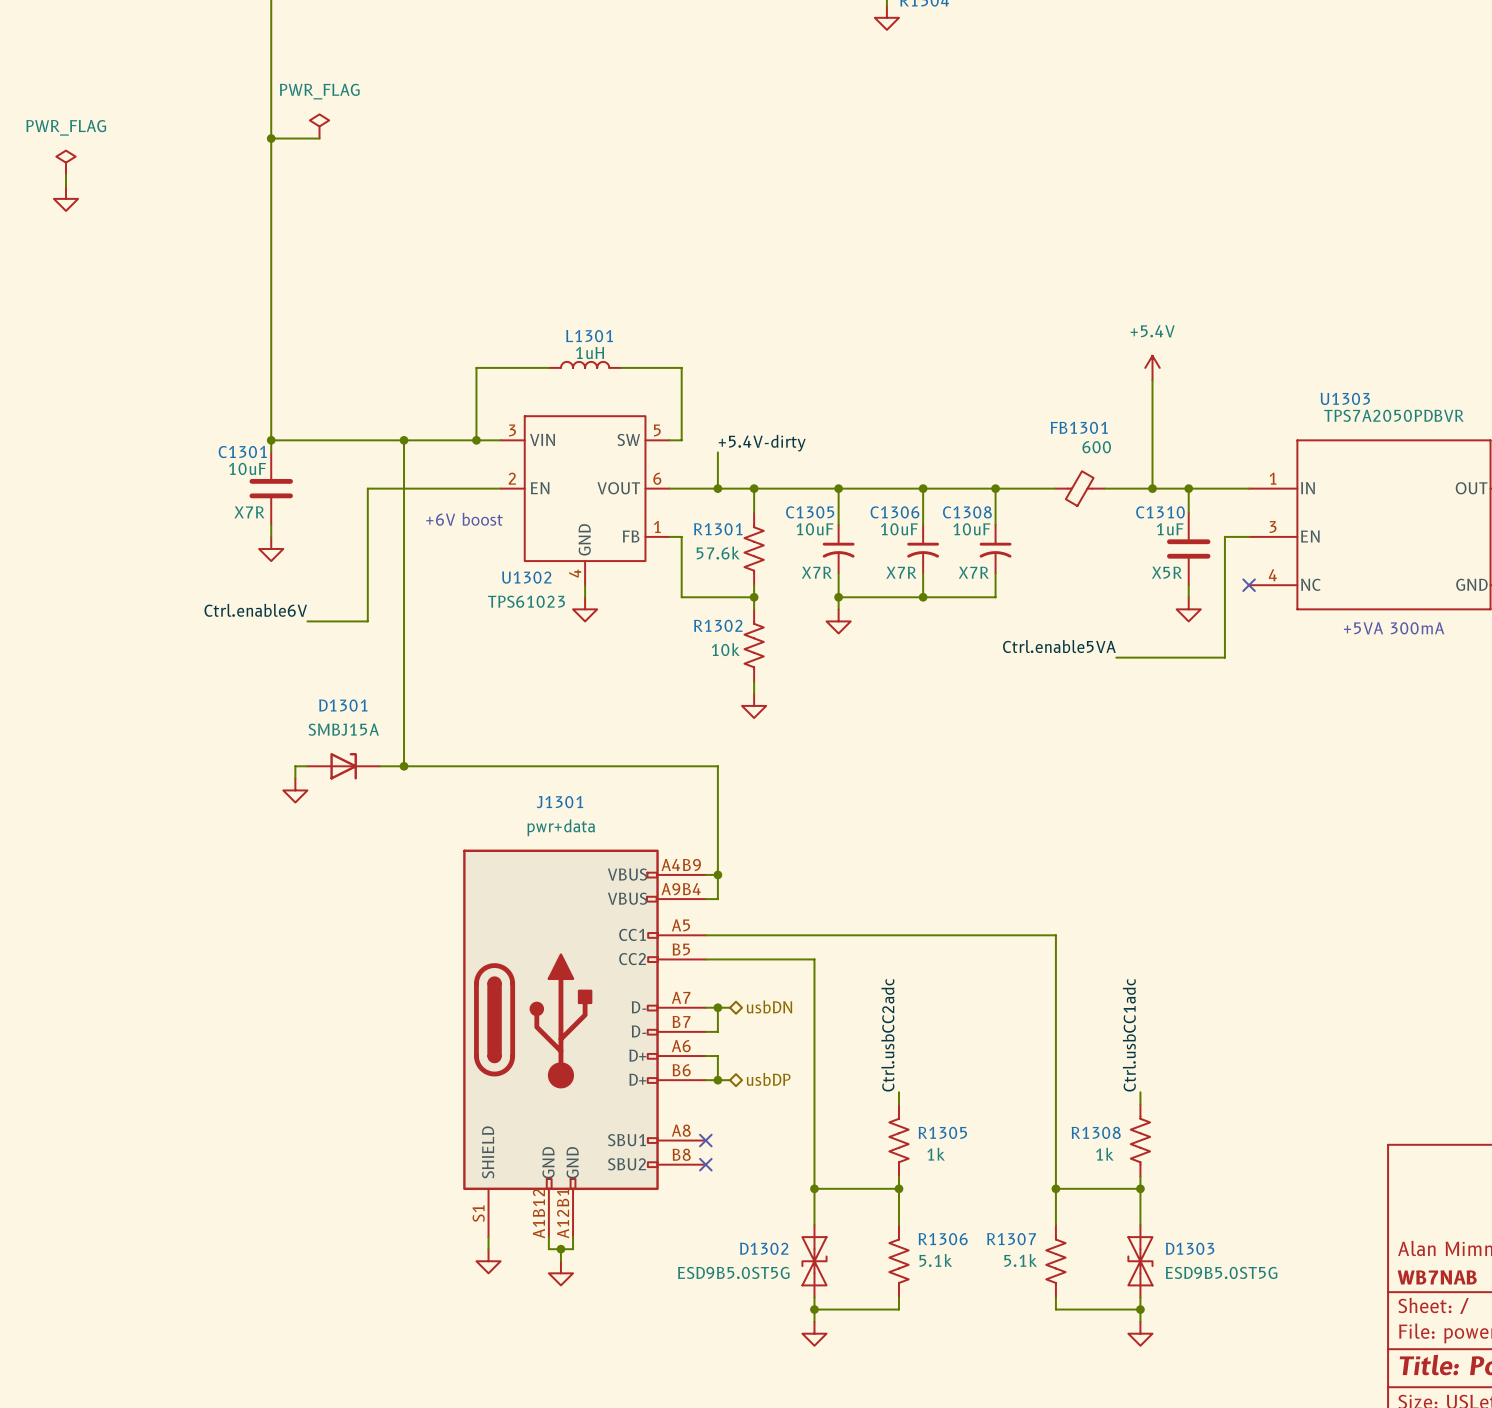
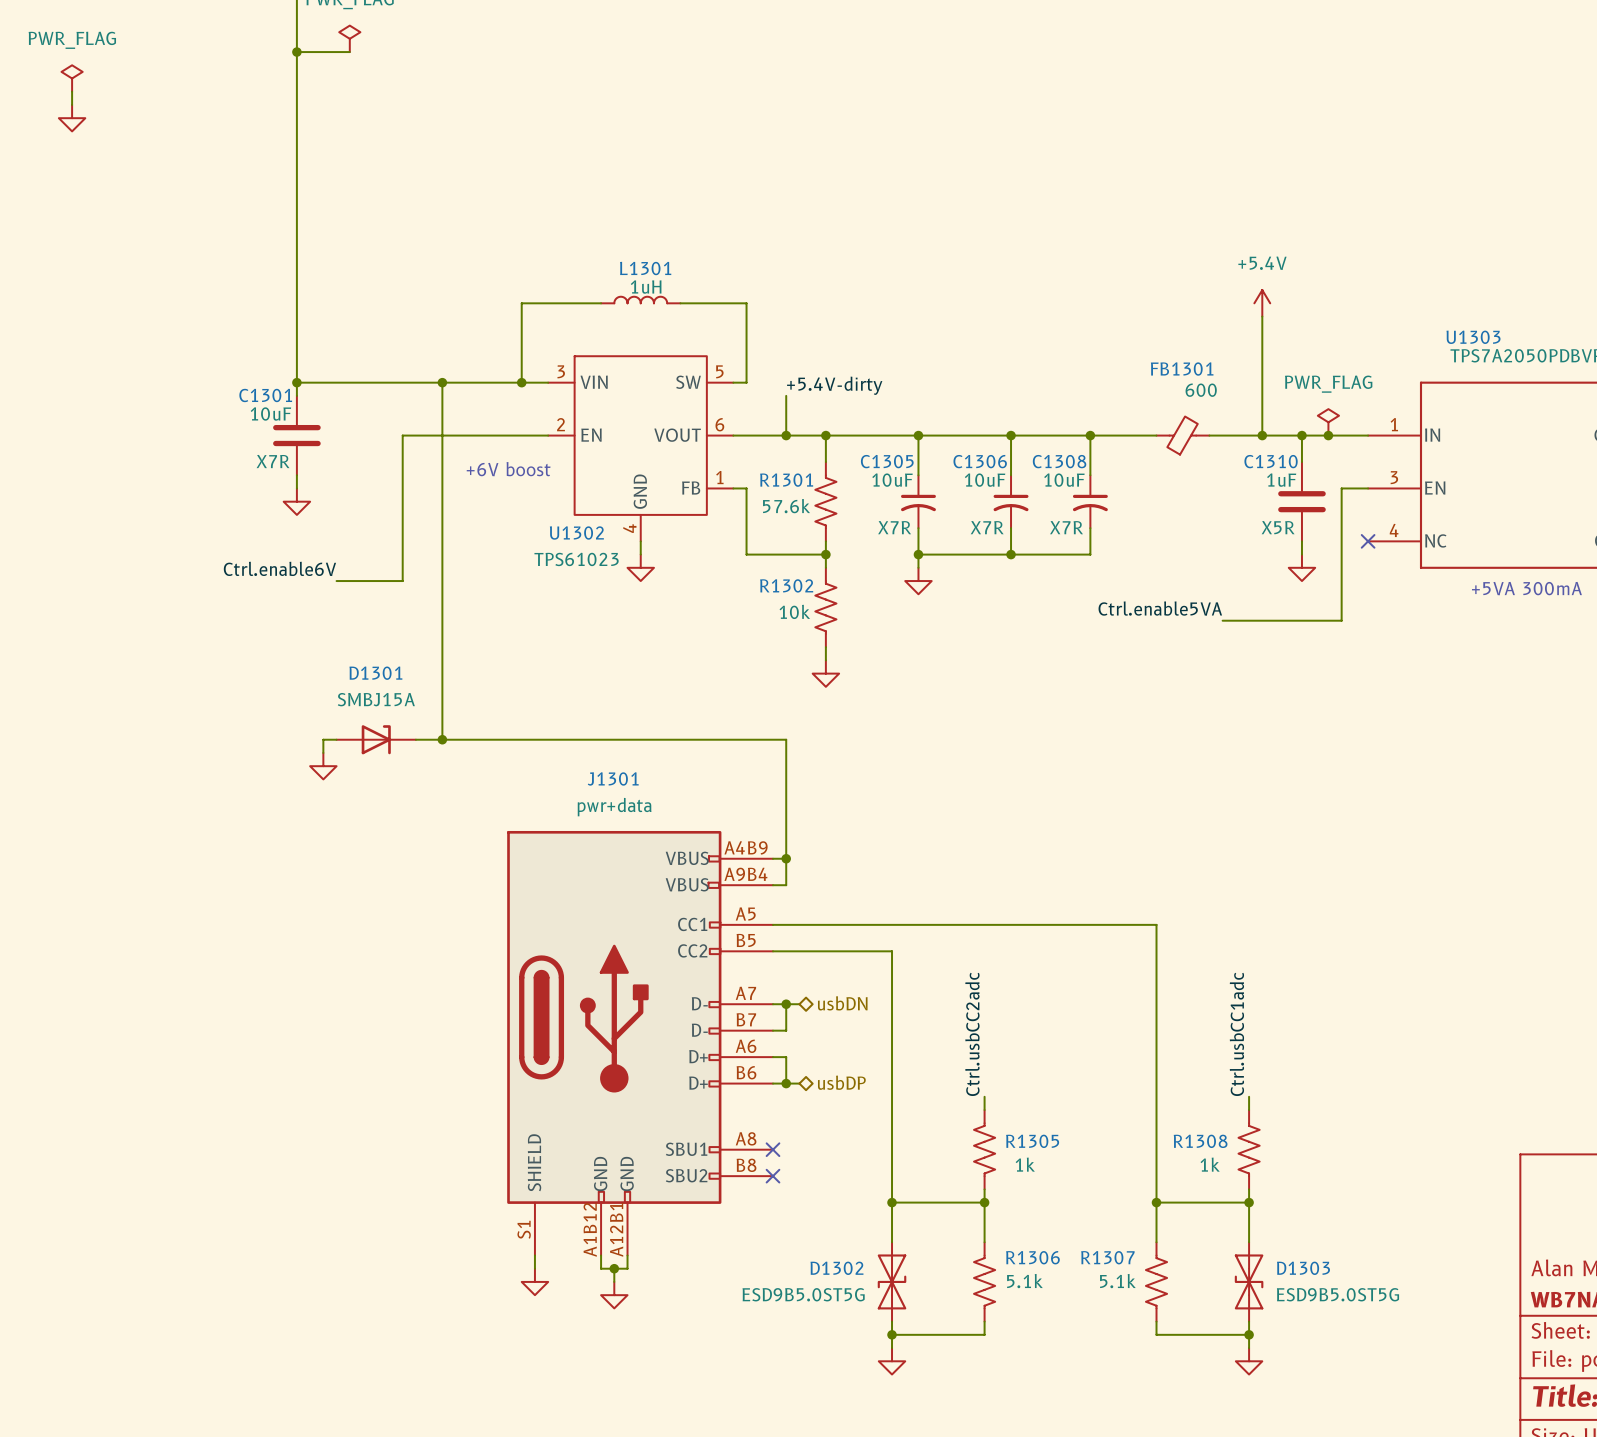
power symbol: none -> PWR_FLAG (1328, 422)
junction: none -> (1328, 435)

